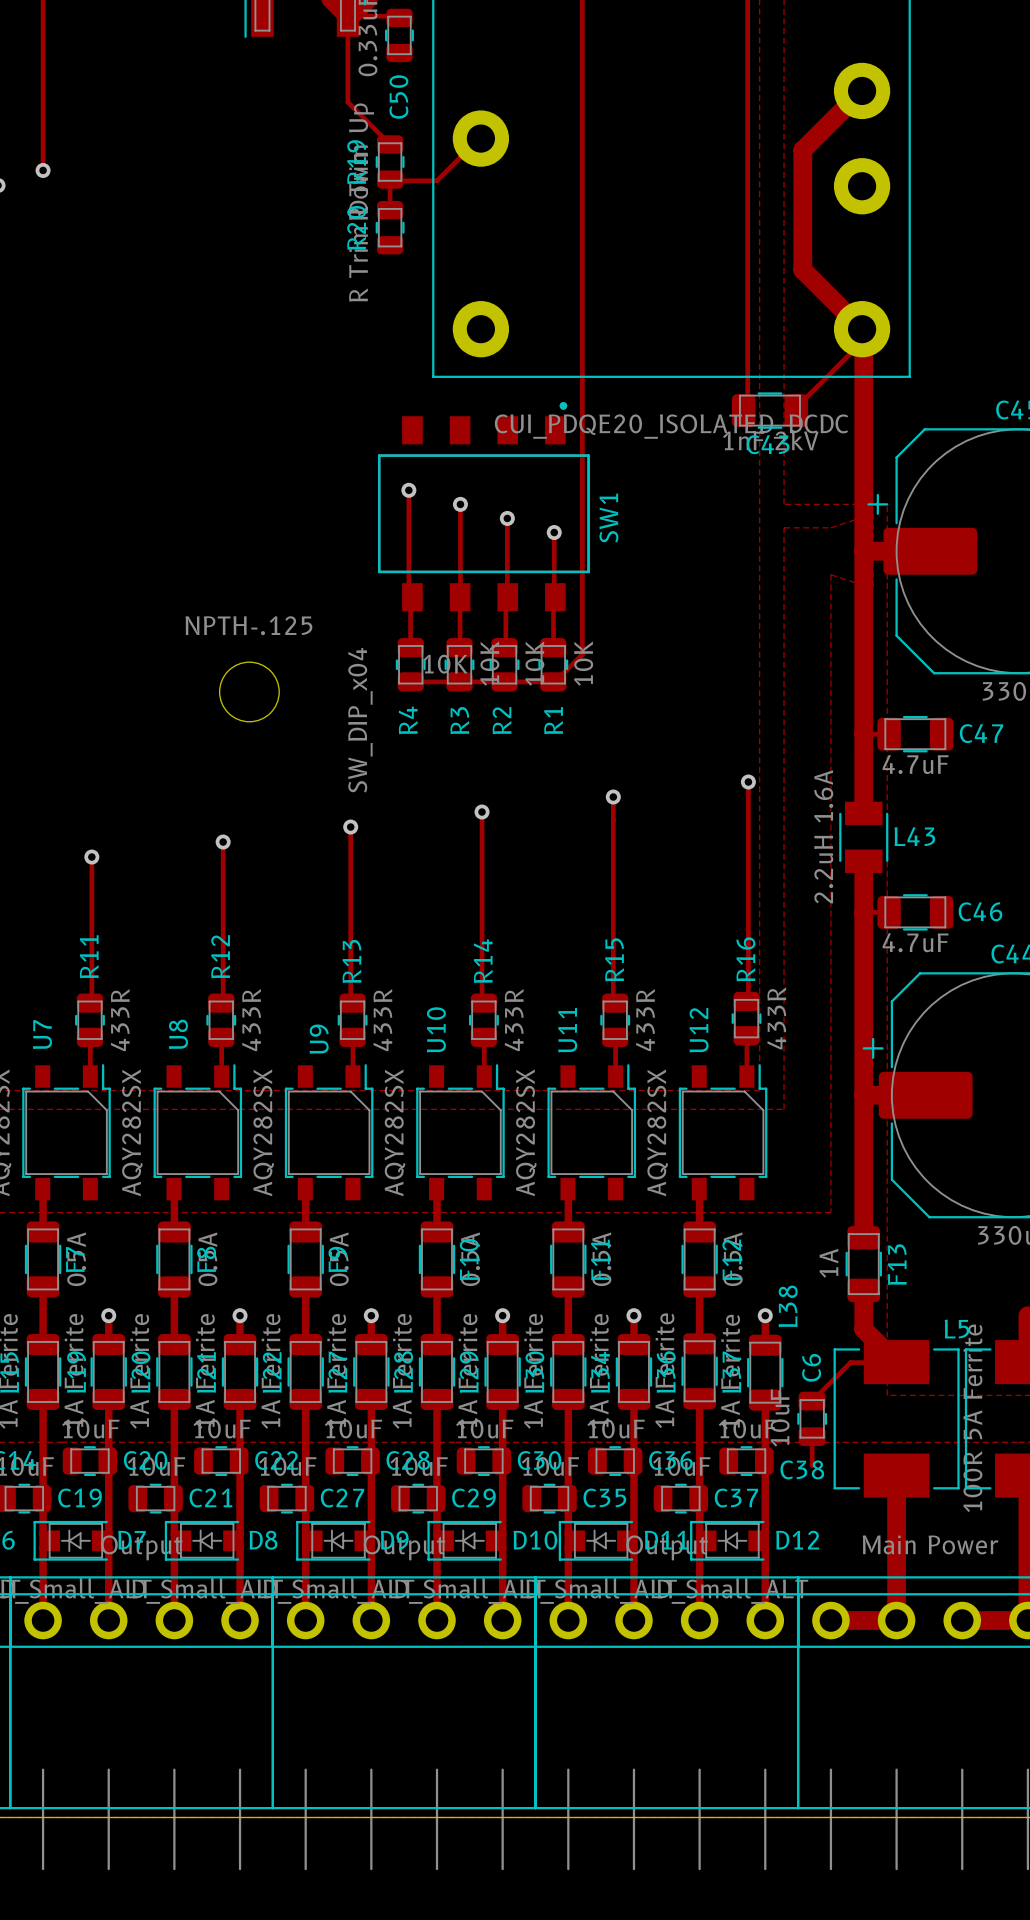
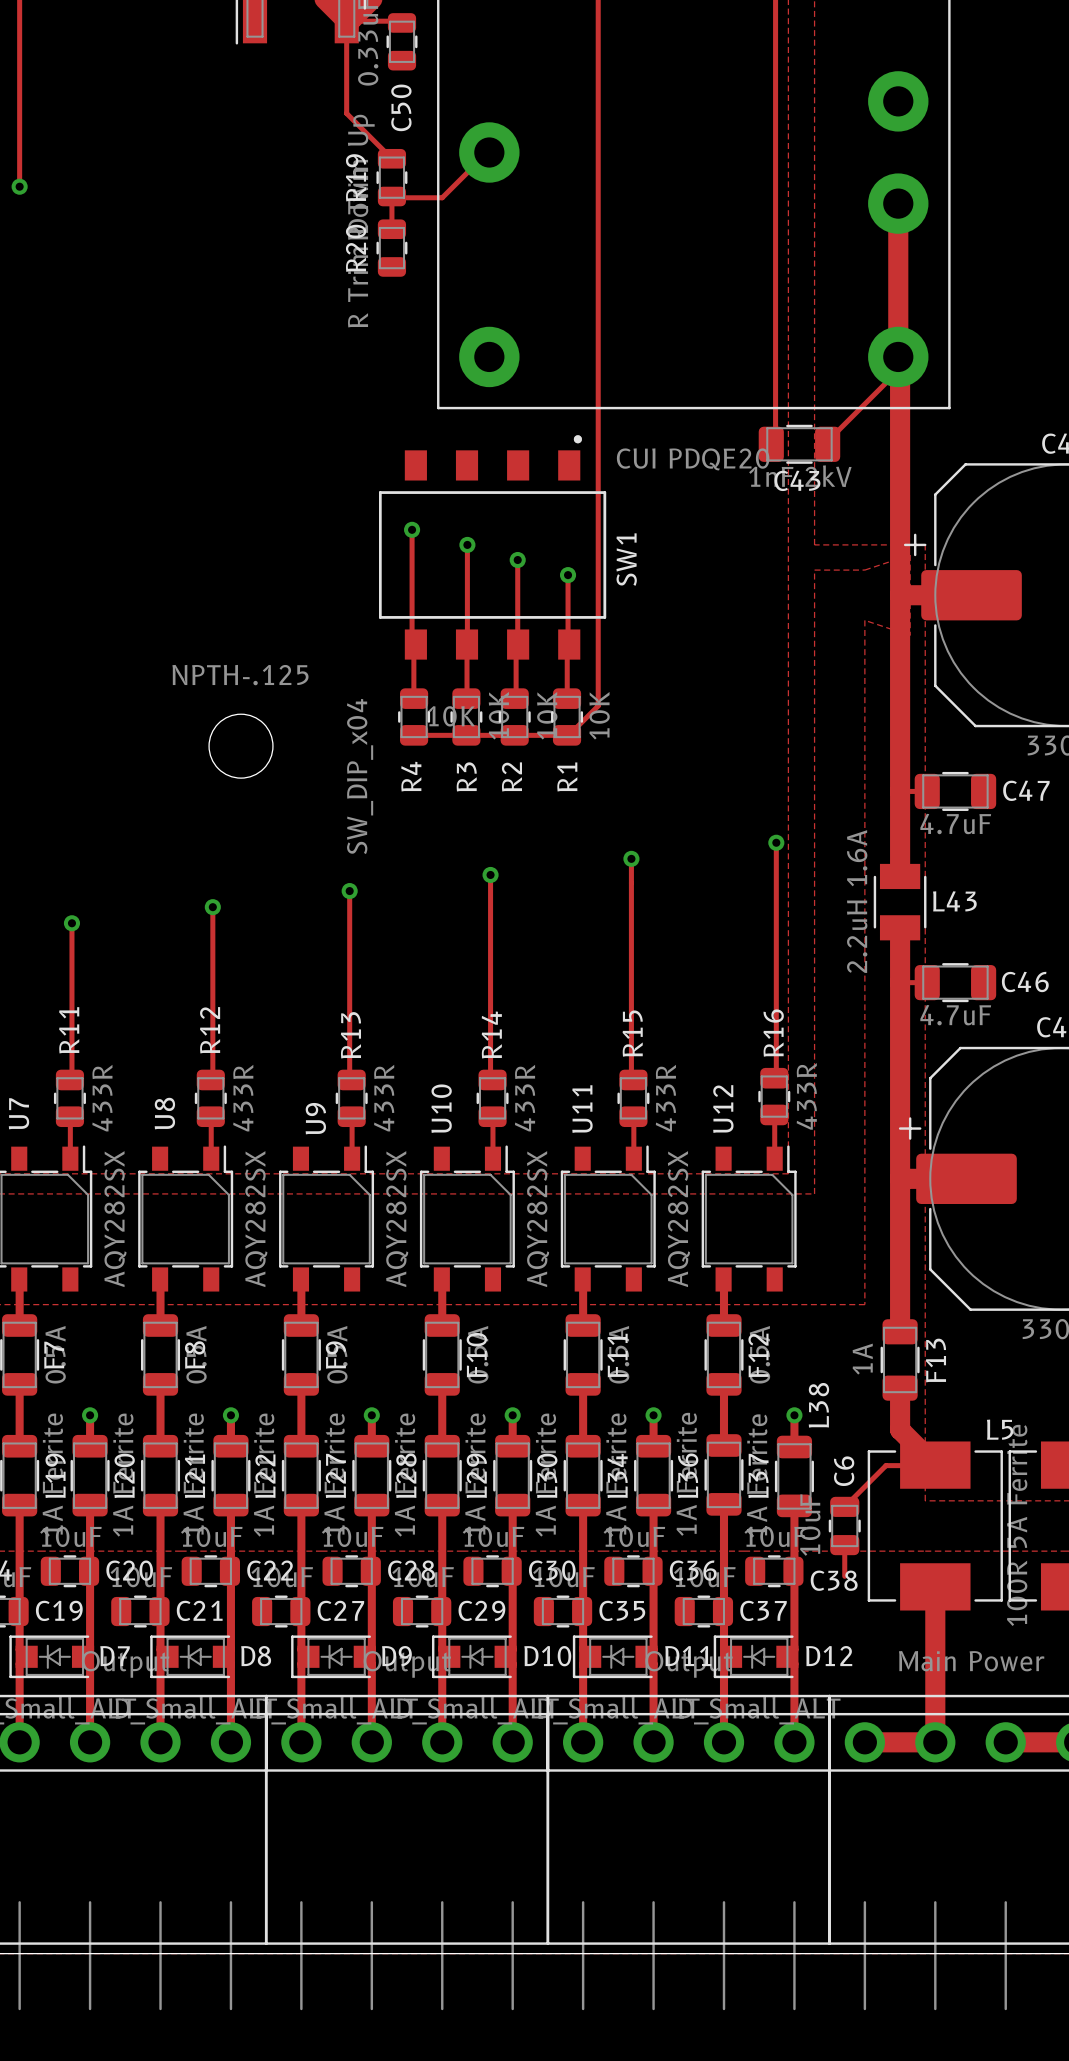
track: (862, 90) (802, 150) (802, 269) (862, 329) -> (898, 203) (898, 356)
part value: CUI_PDQE20_ISOLATED_DCDC (671, 426) -> CUI PDQE20 (693, 459)

